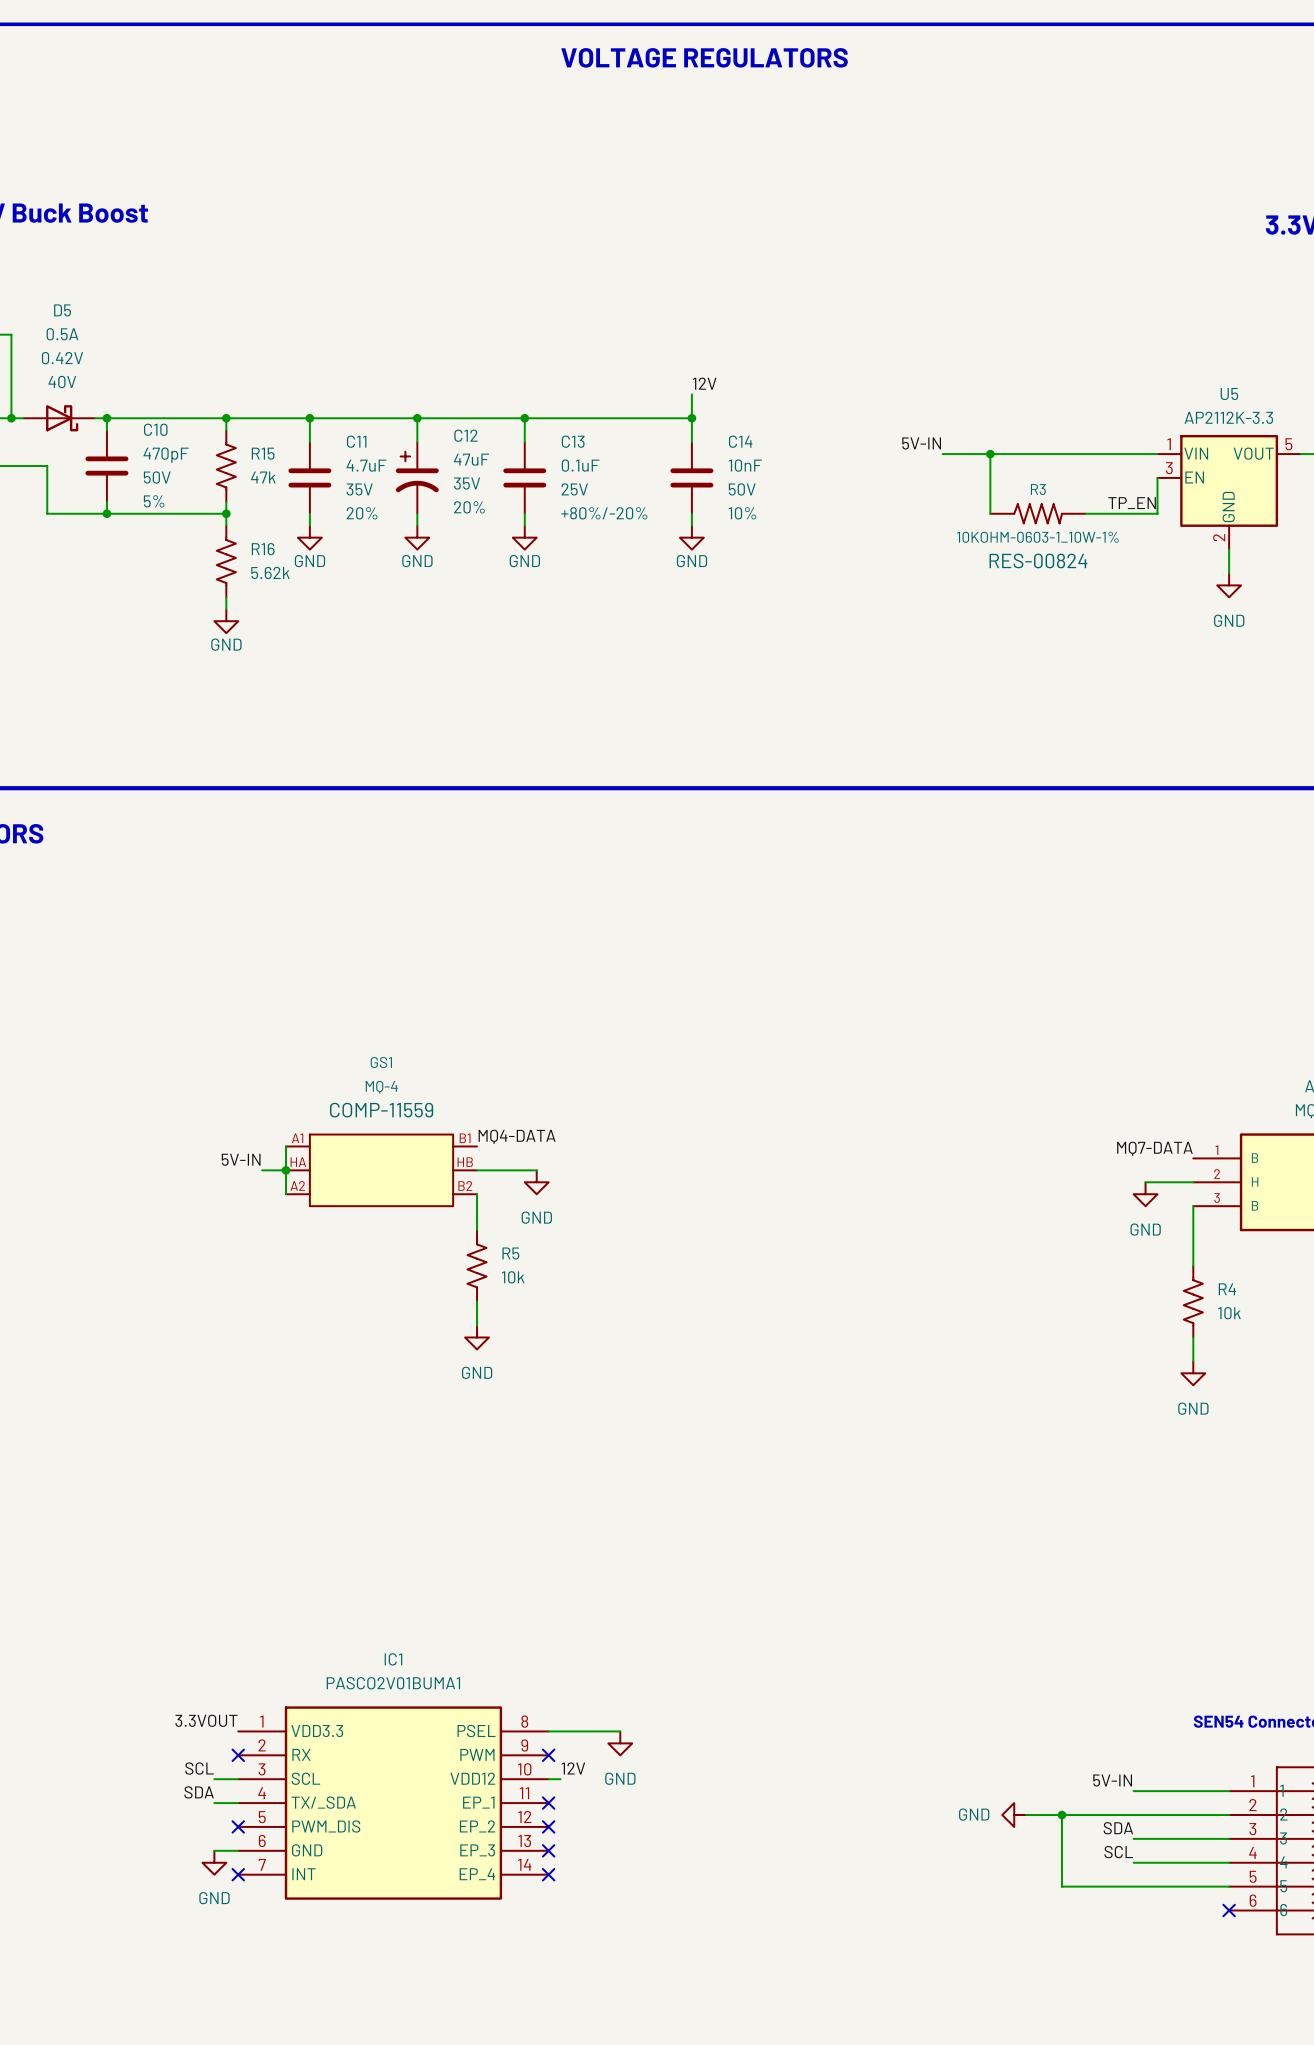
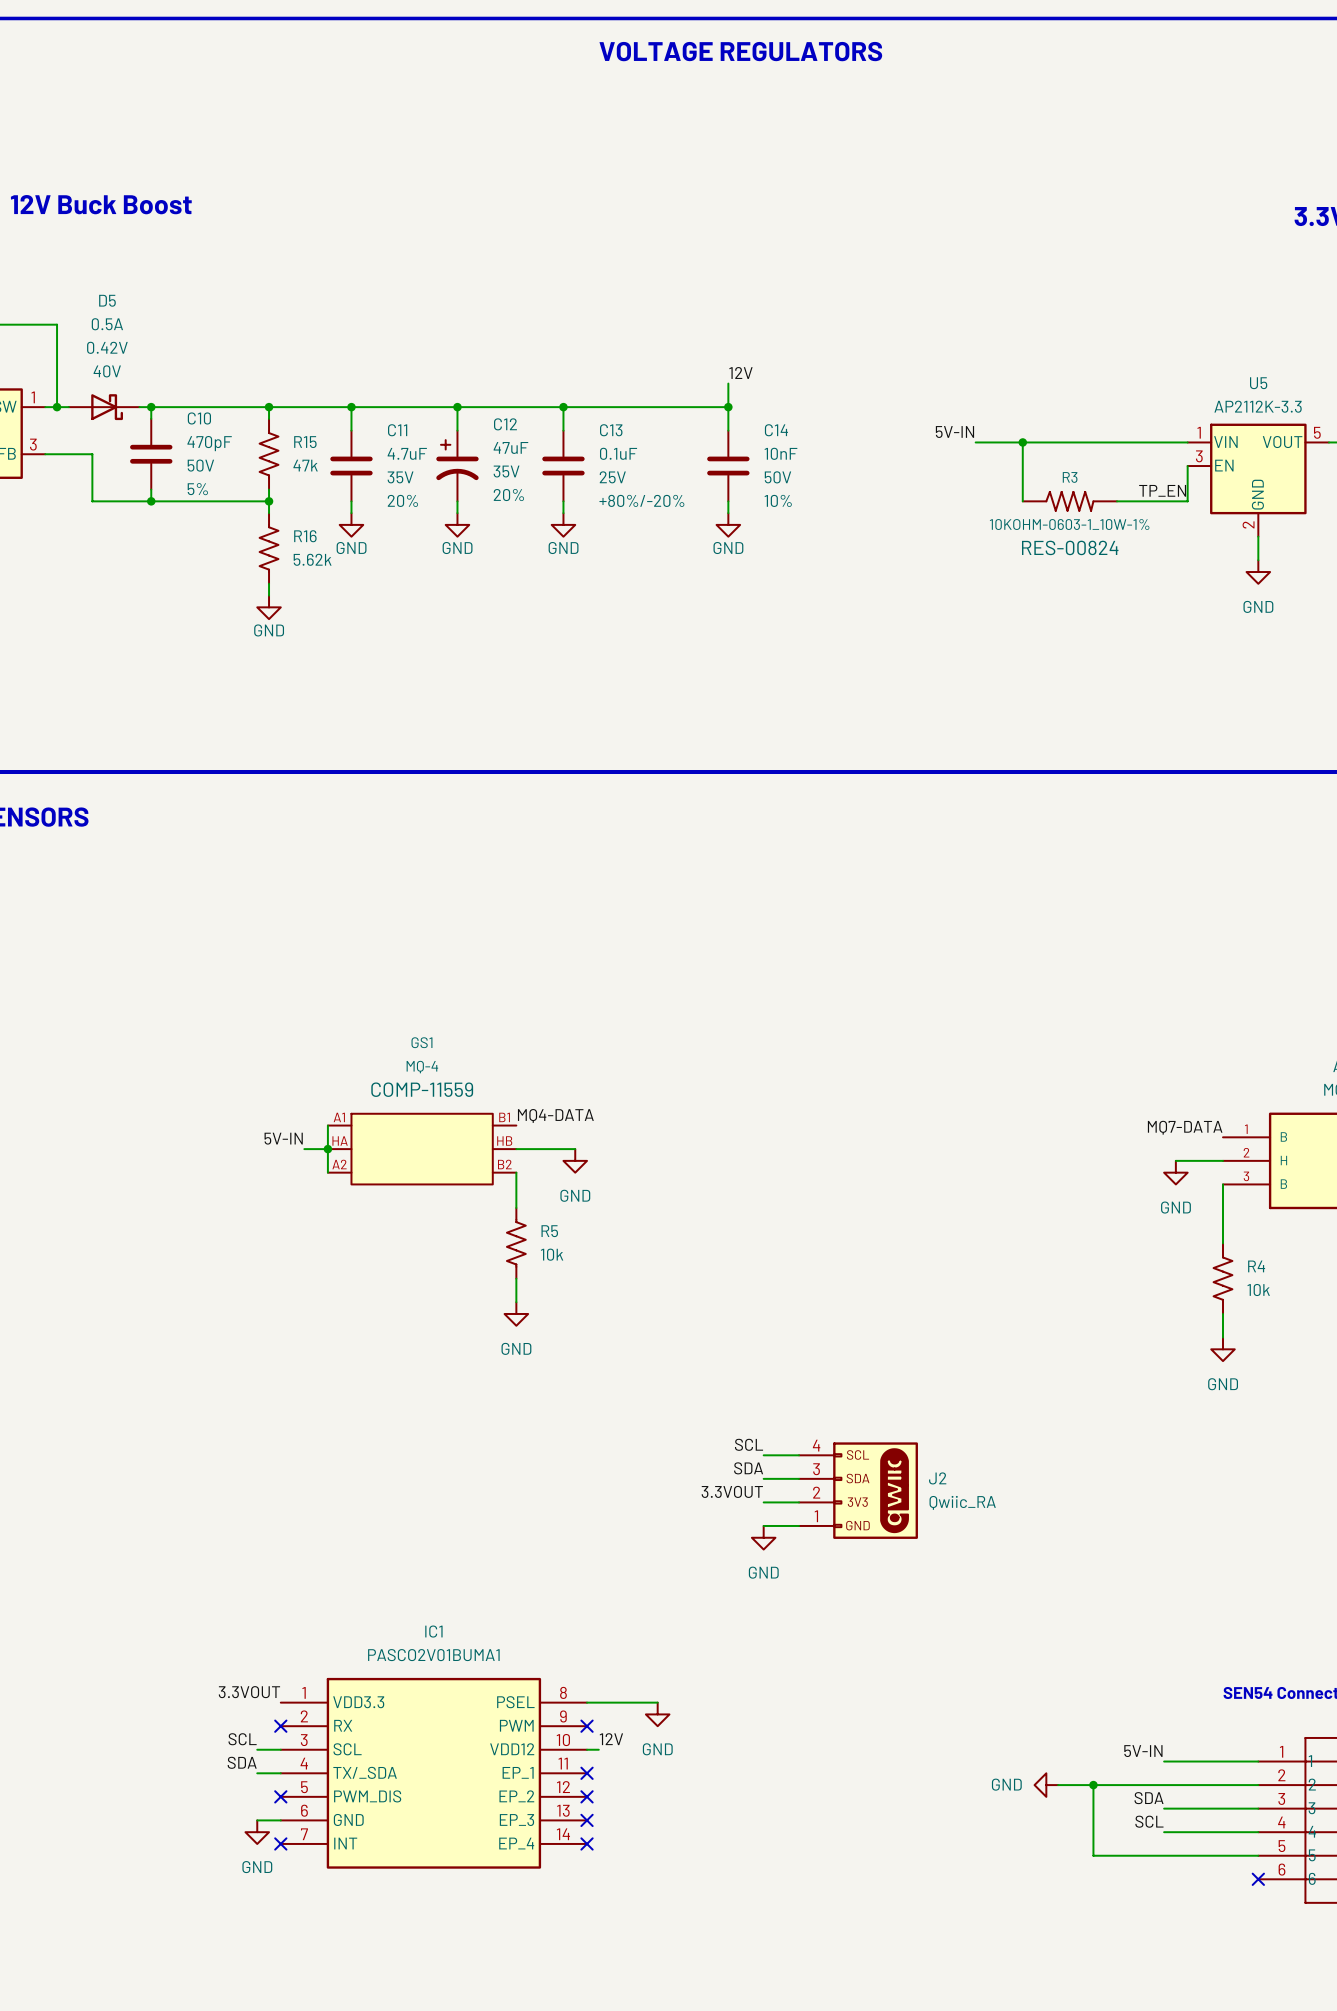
label: none -> SCL (749, 1444)
wire: none -> (763, 1455) (799, 1455)
label: none -> SDA (748, 1468)
wire: none -> (763, 1478) (799, 1478)
J2: none -> Qwiic_RA (858, 1490)
label: none -> 3.3VOUT (732, 1491)
wire: none -> (763, 1502) (799, 1502)
wire: none -> (763, 1525) (799, 1525)
power symbol: none -> GND (763, 1537)

